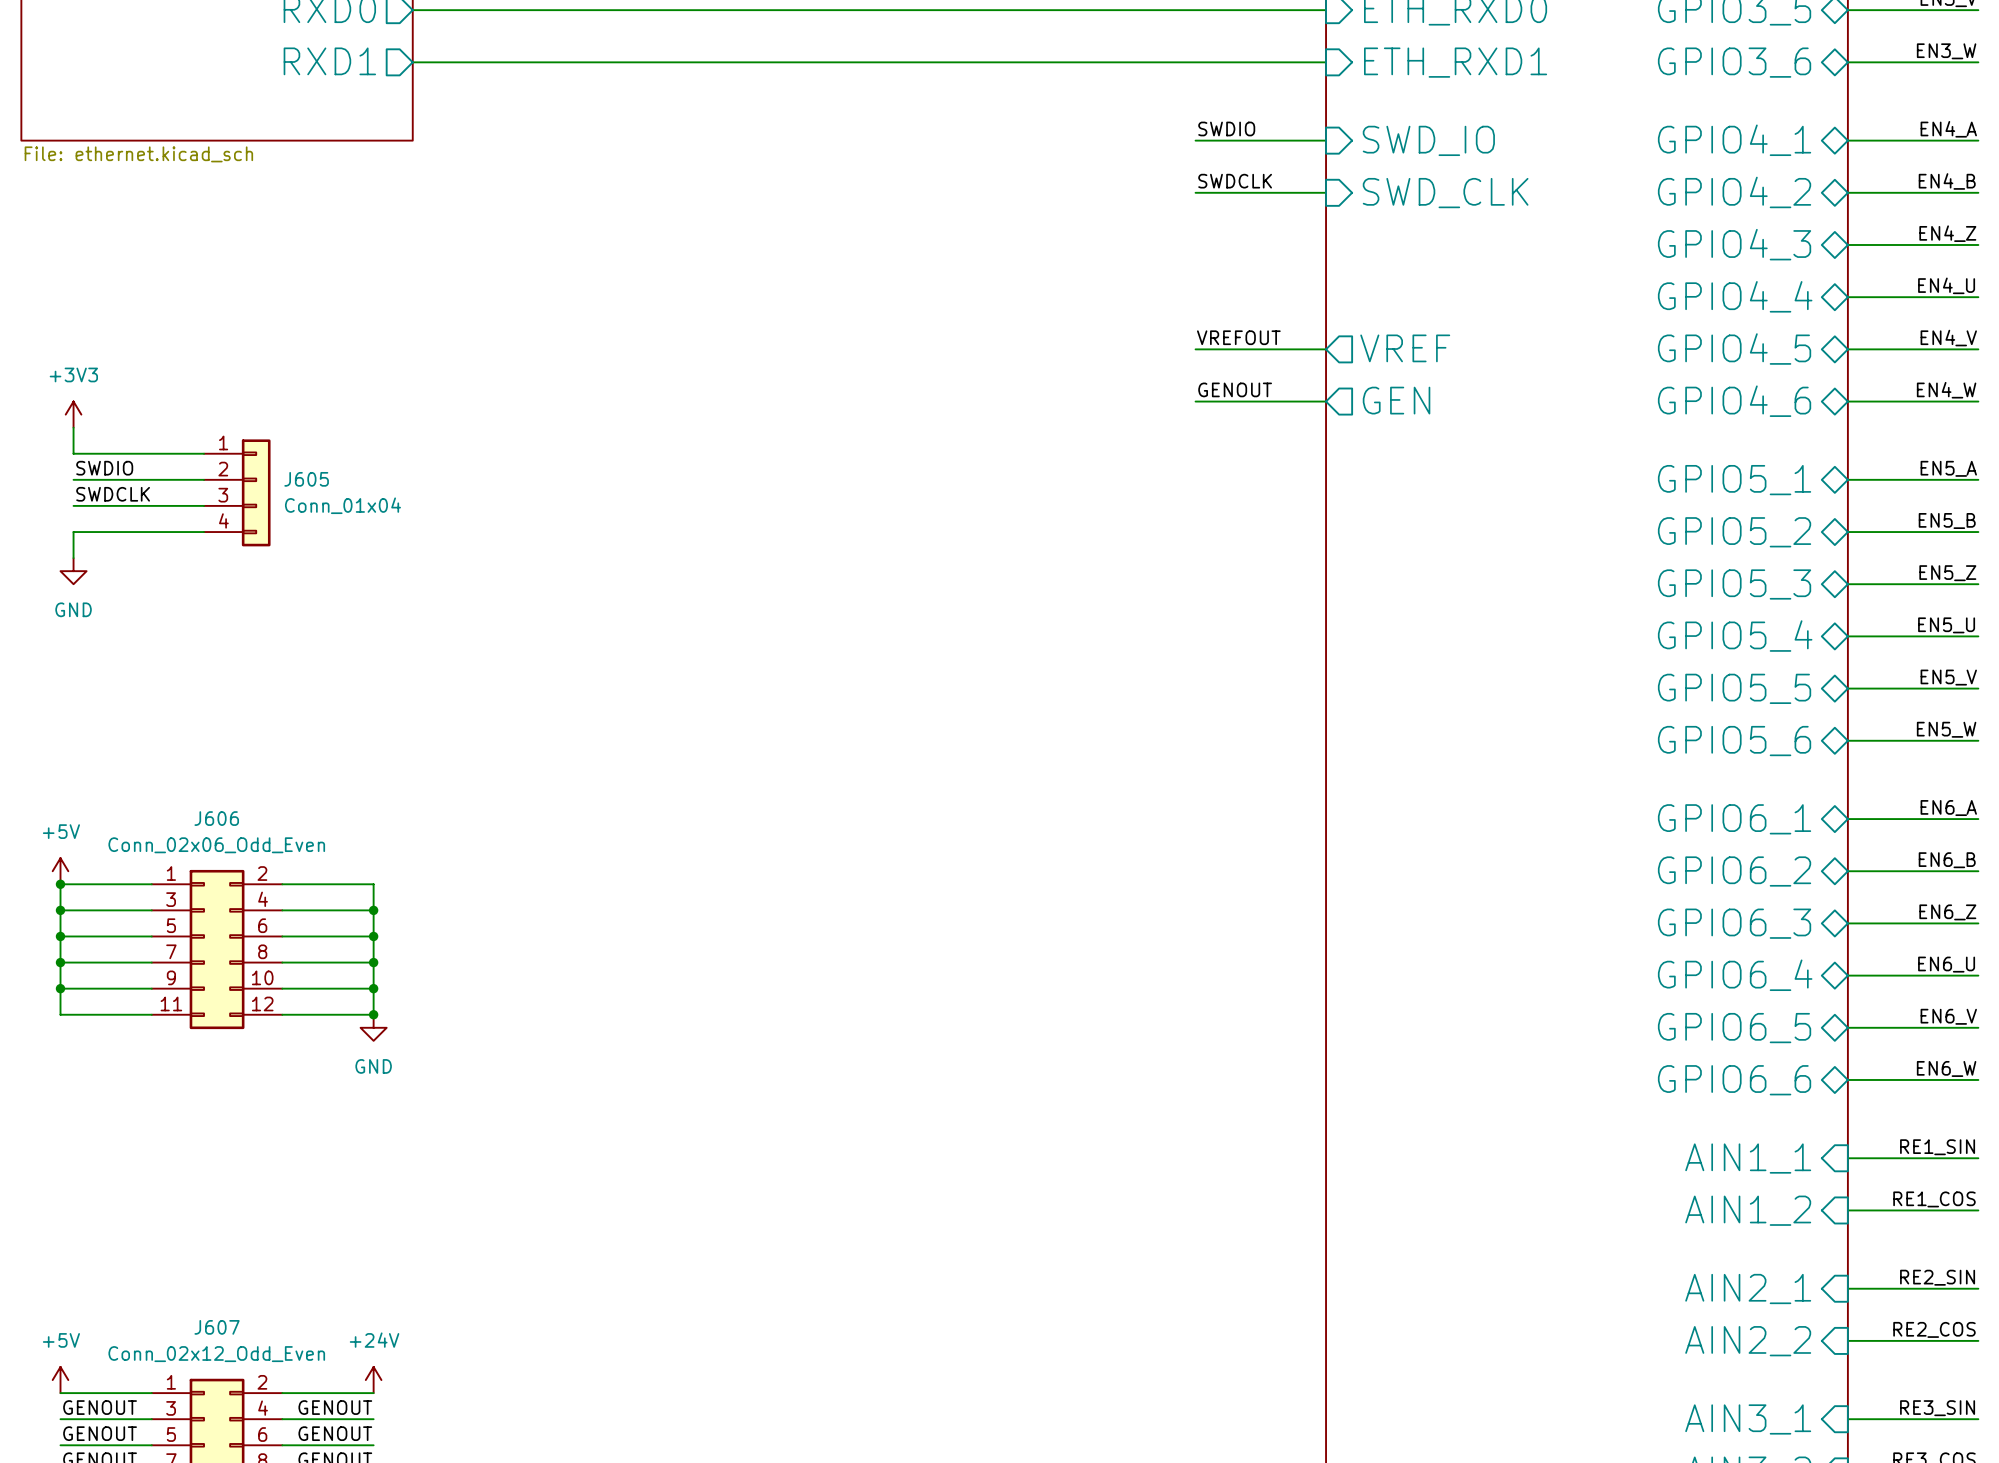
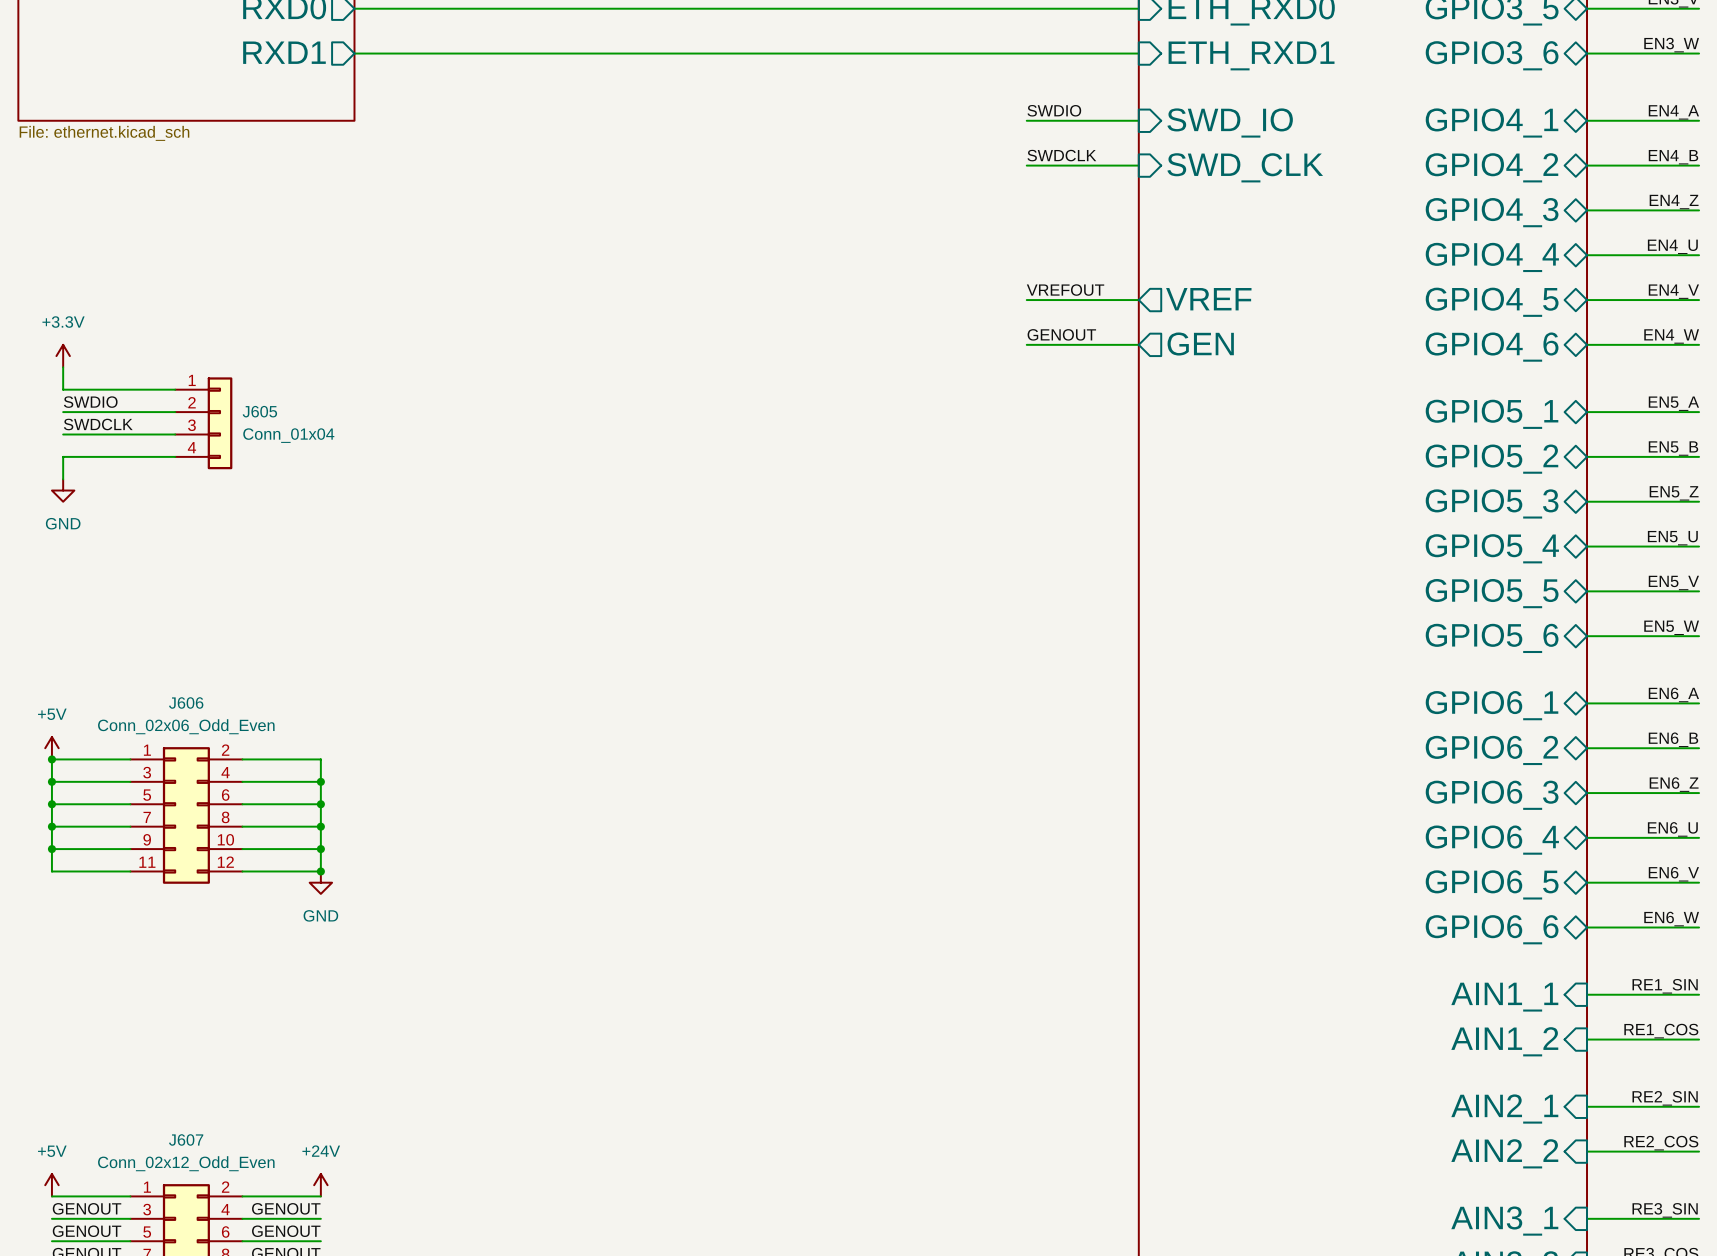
power symbol: +3V3 (73, 414) -> +3.3V (63, 356)

